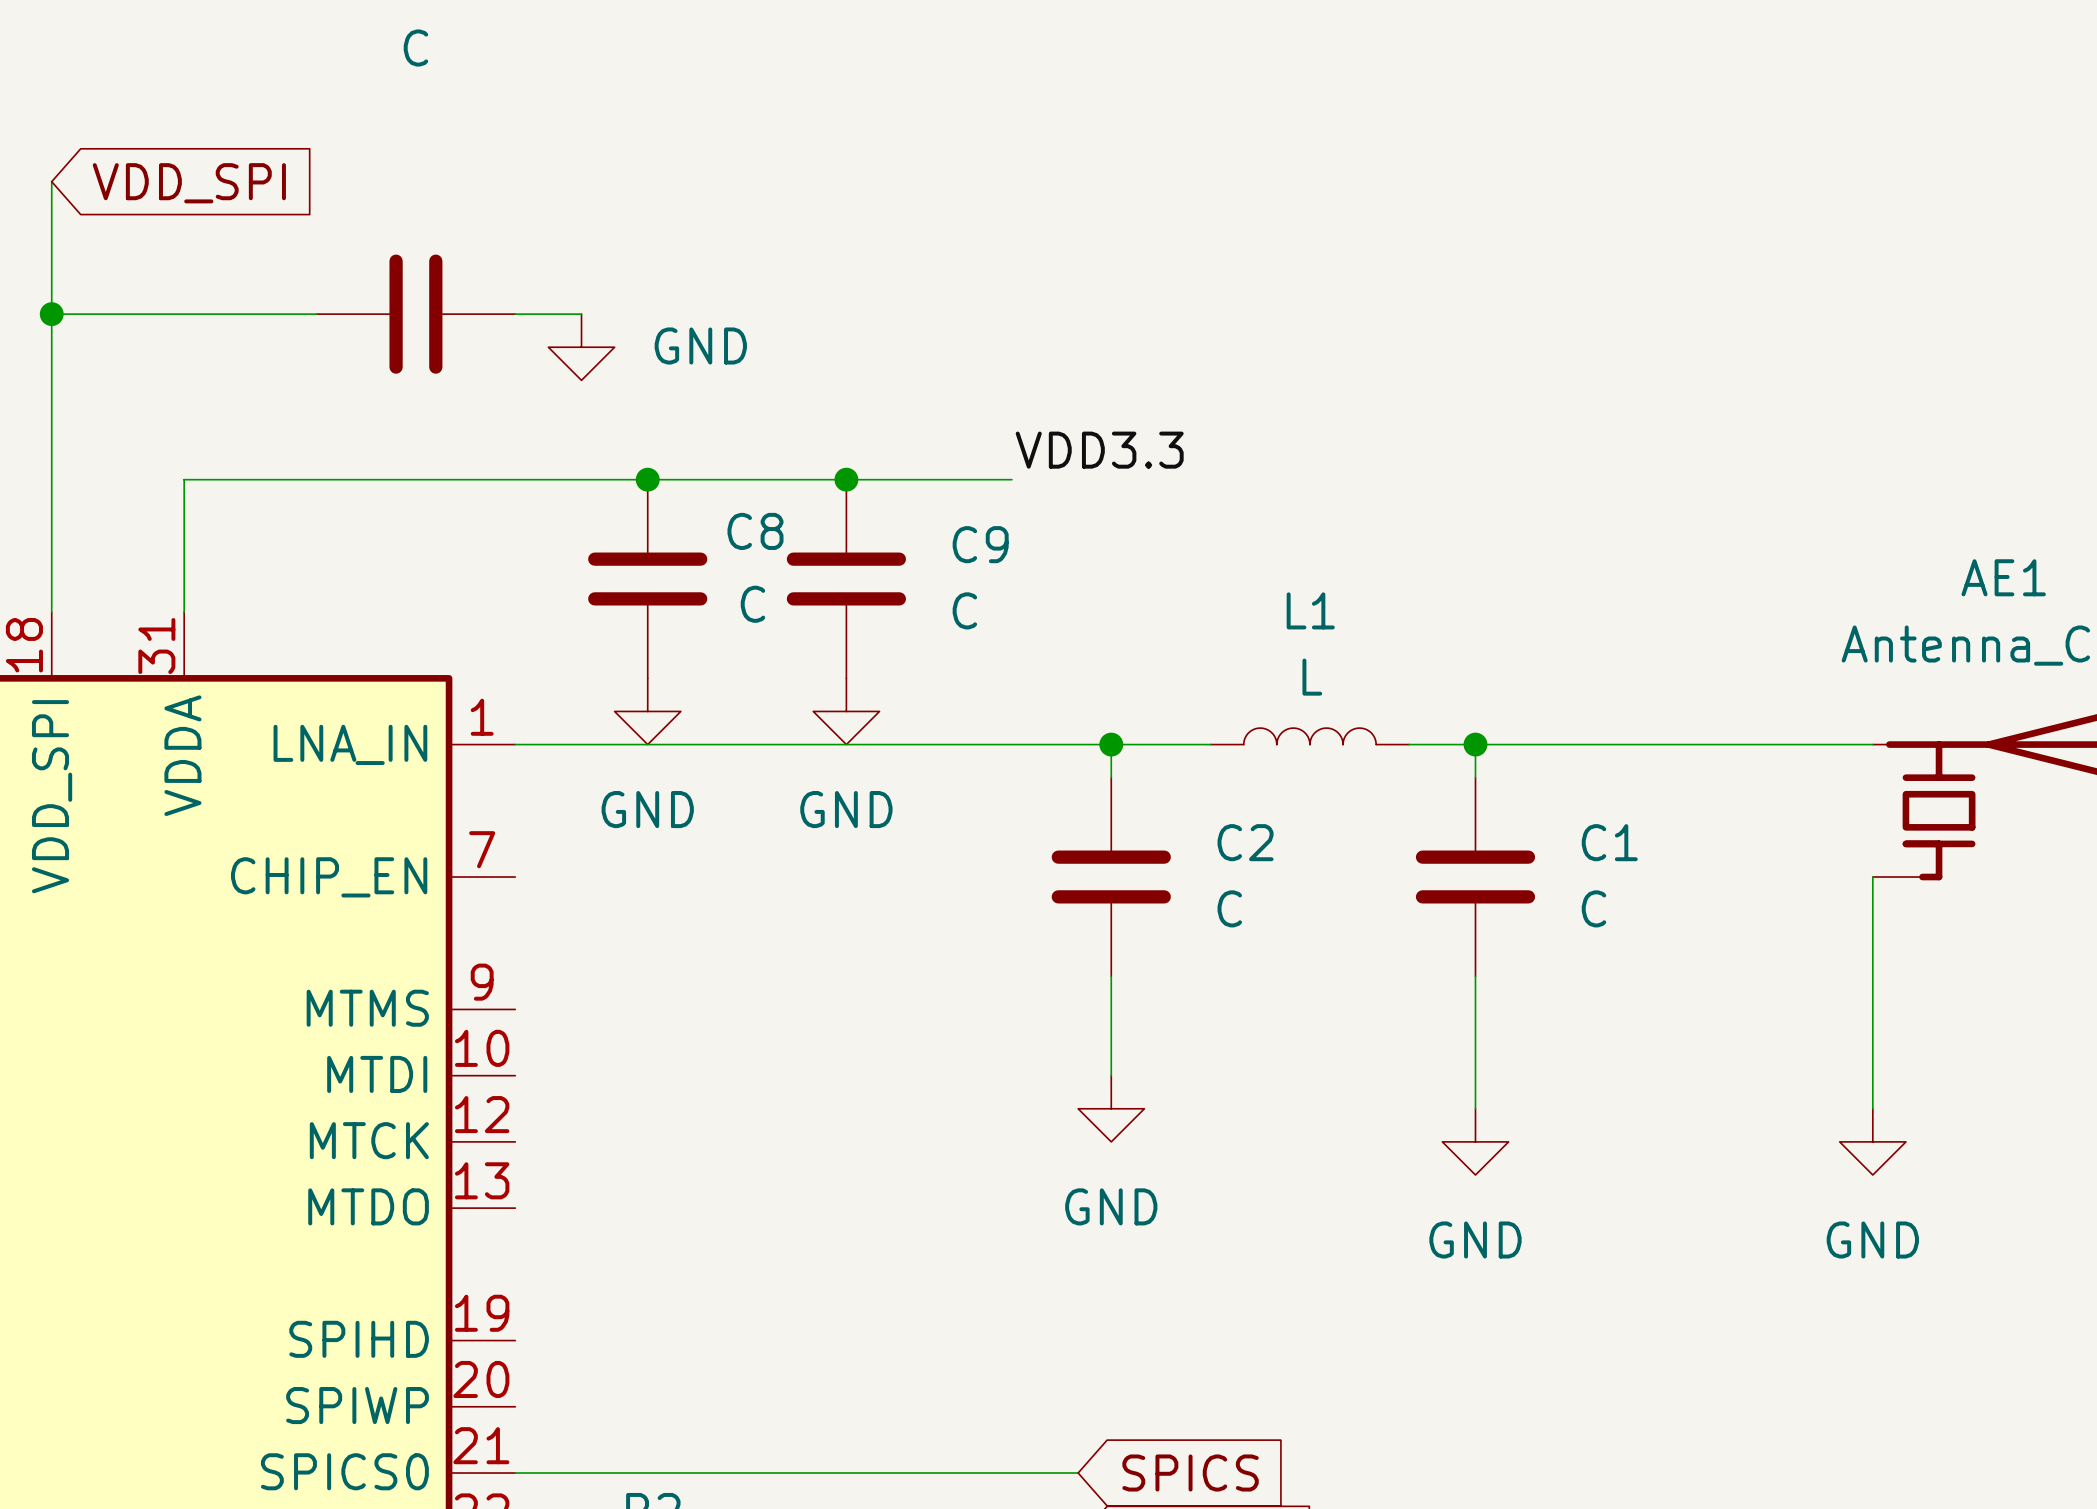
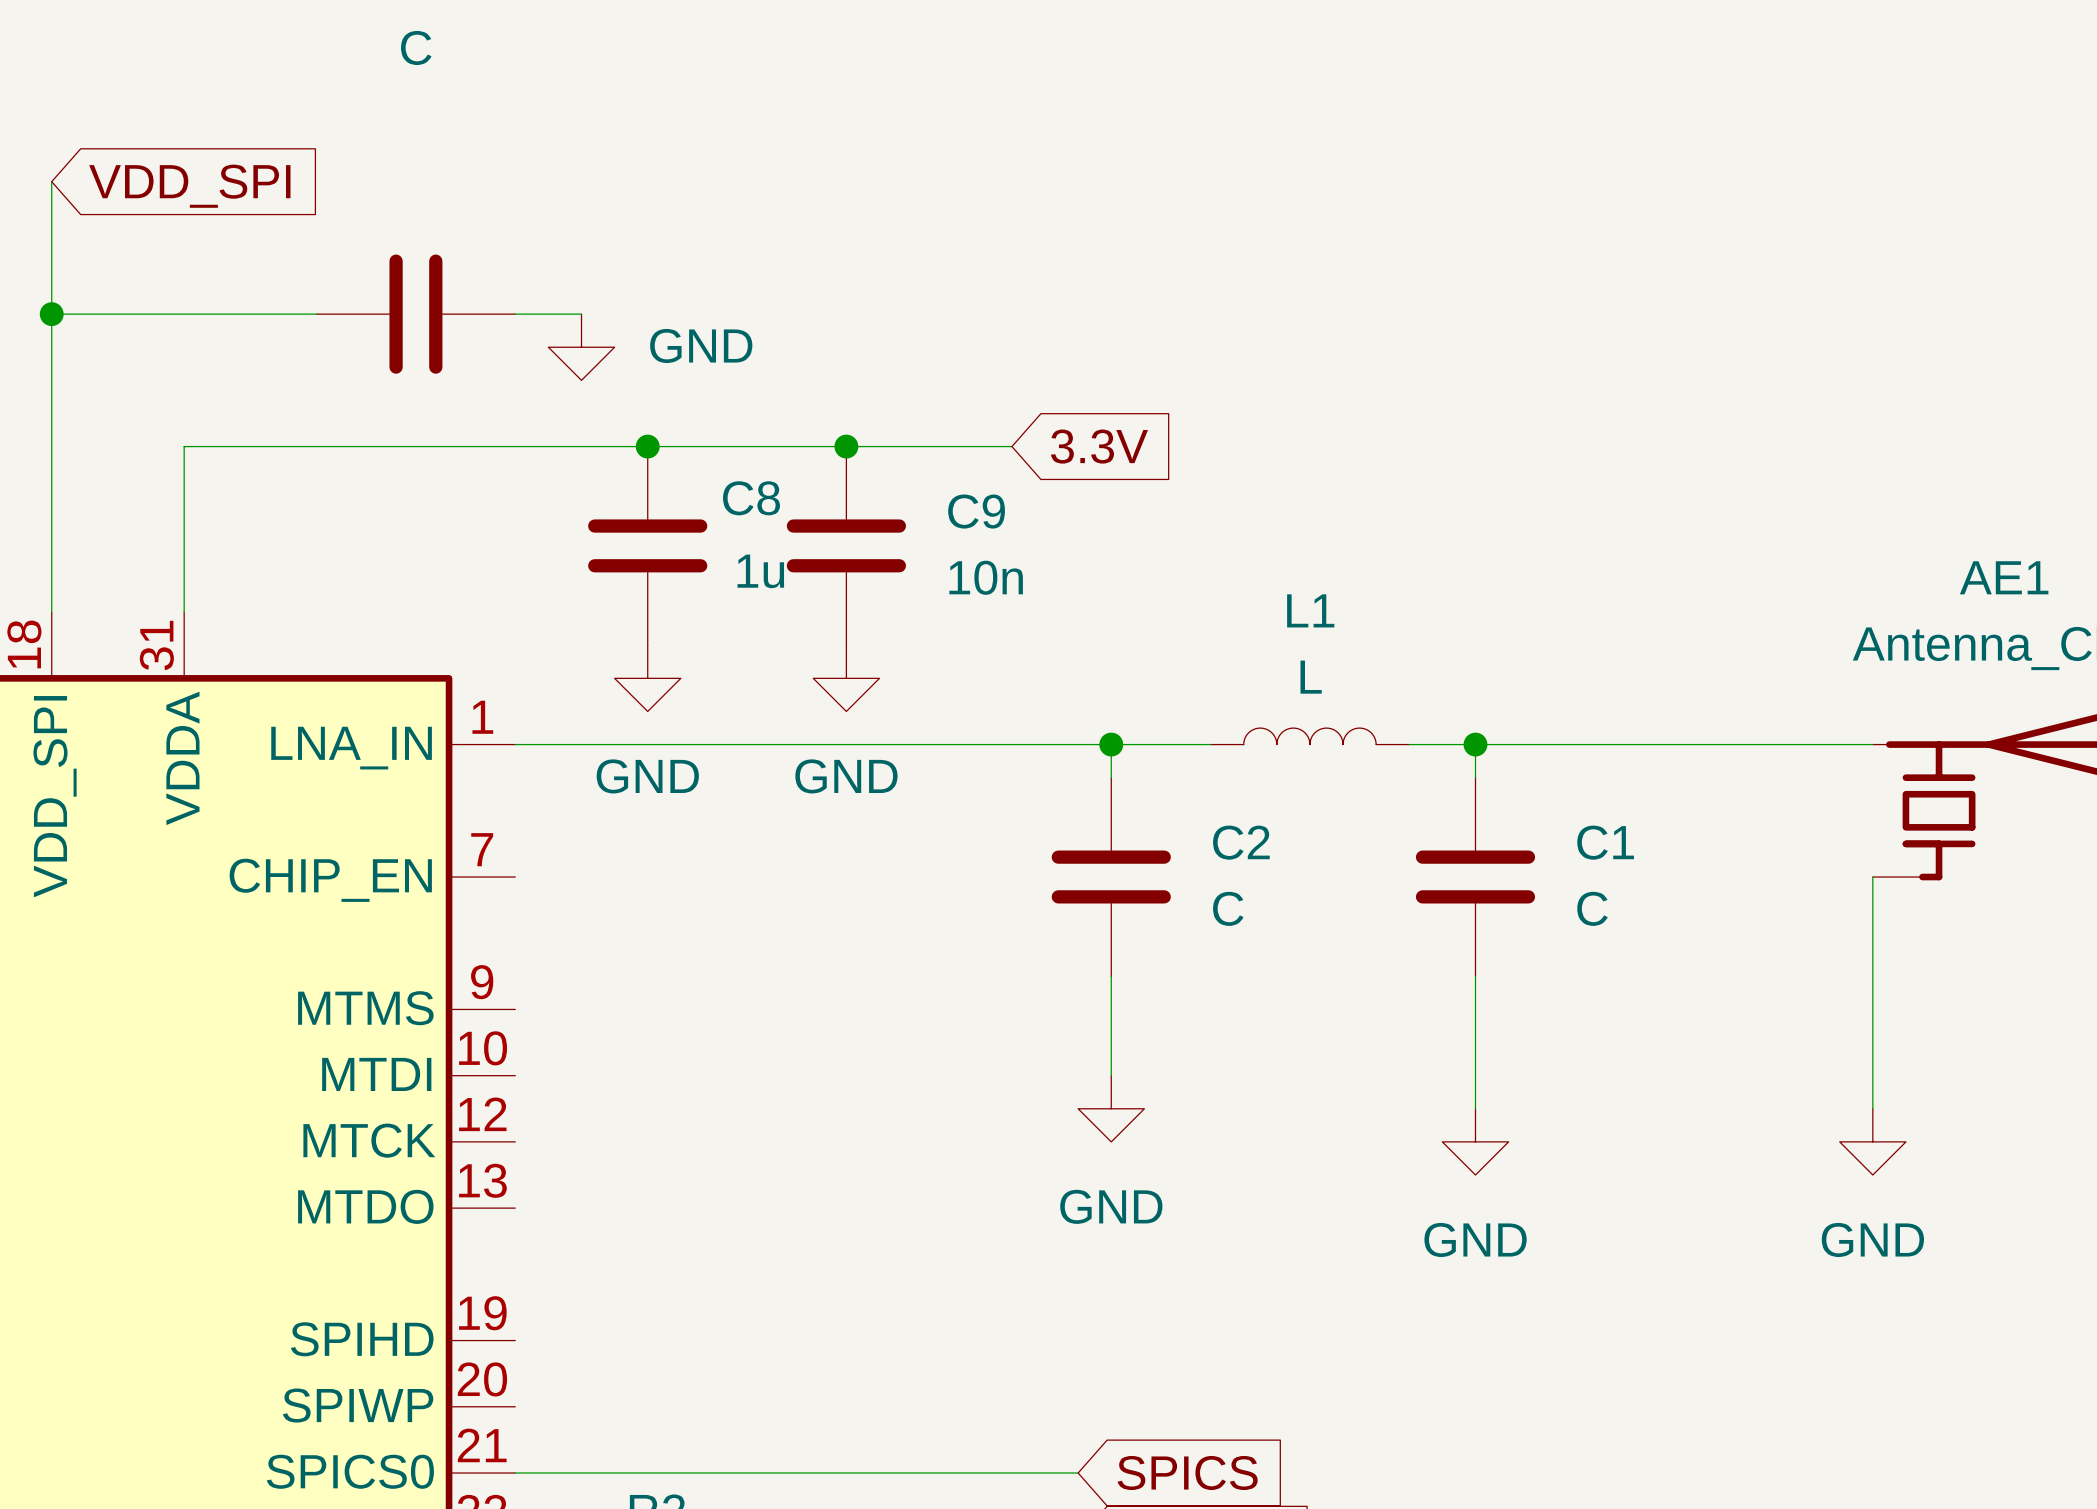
global label: none -> 3.3V (1099, 446)
label: VDD3.3 (1099, 450) -> none
wire: (184, 479) (1011, 479) -> (184, 479) (184, 446) (1011, 446)
junction position: (647, 479) -> (647, 446)
junction position: (846, 479) -> (846, 446)
C8 position: (647, 579) -> (647, 545)
C9 position: (846, 579) -> (846, 545)
C8 value: C (752, 604) -> 1u (760, 571)
C9 value: C (964, 610) -> 10n (986, 577)
power symbol position: GND (647, 711) -> GND (647, 678)
power symbol position: GND (846, 711) -> GND (846, 678)

